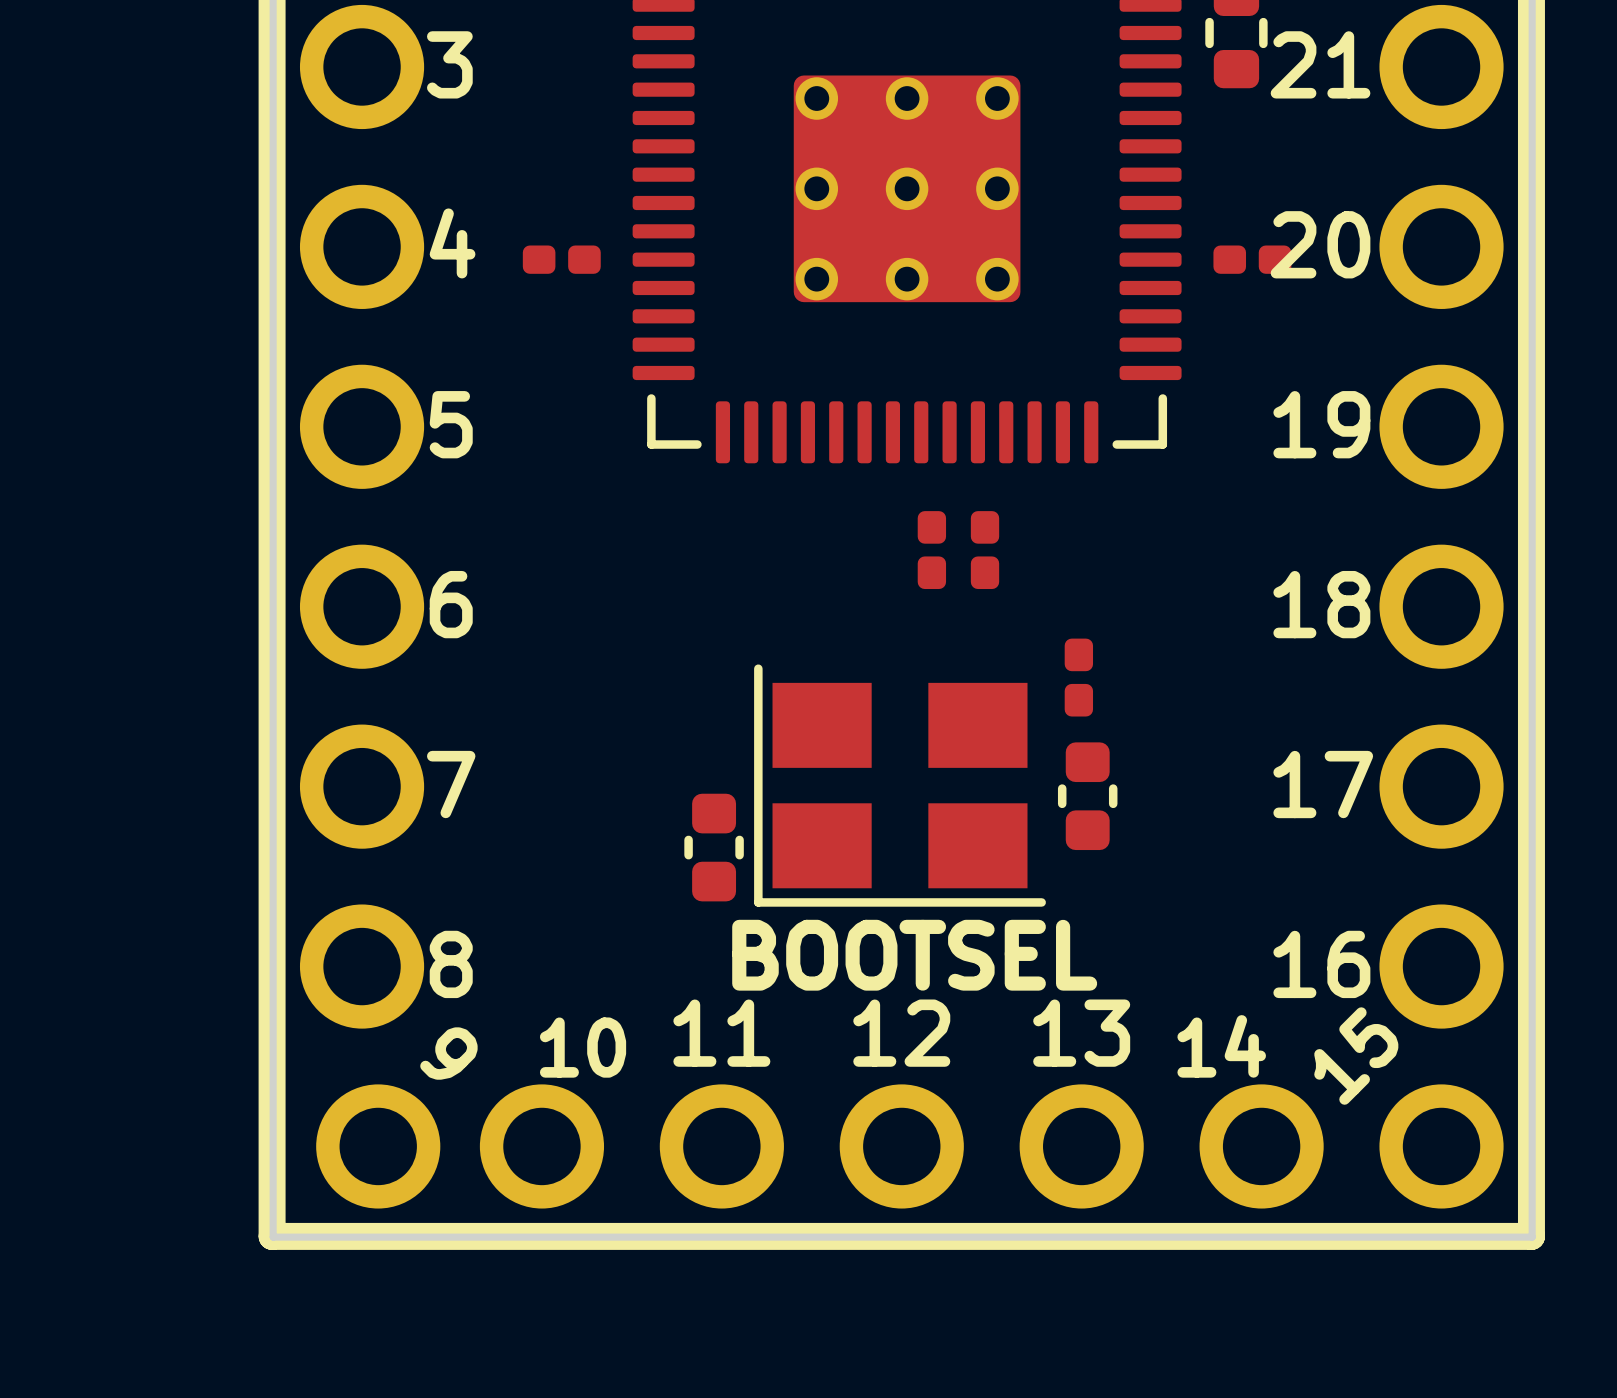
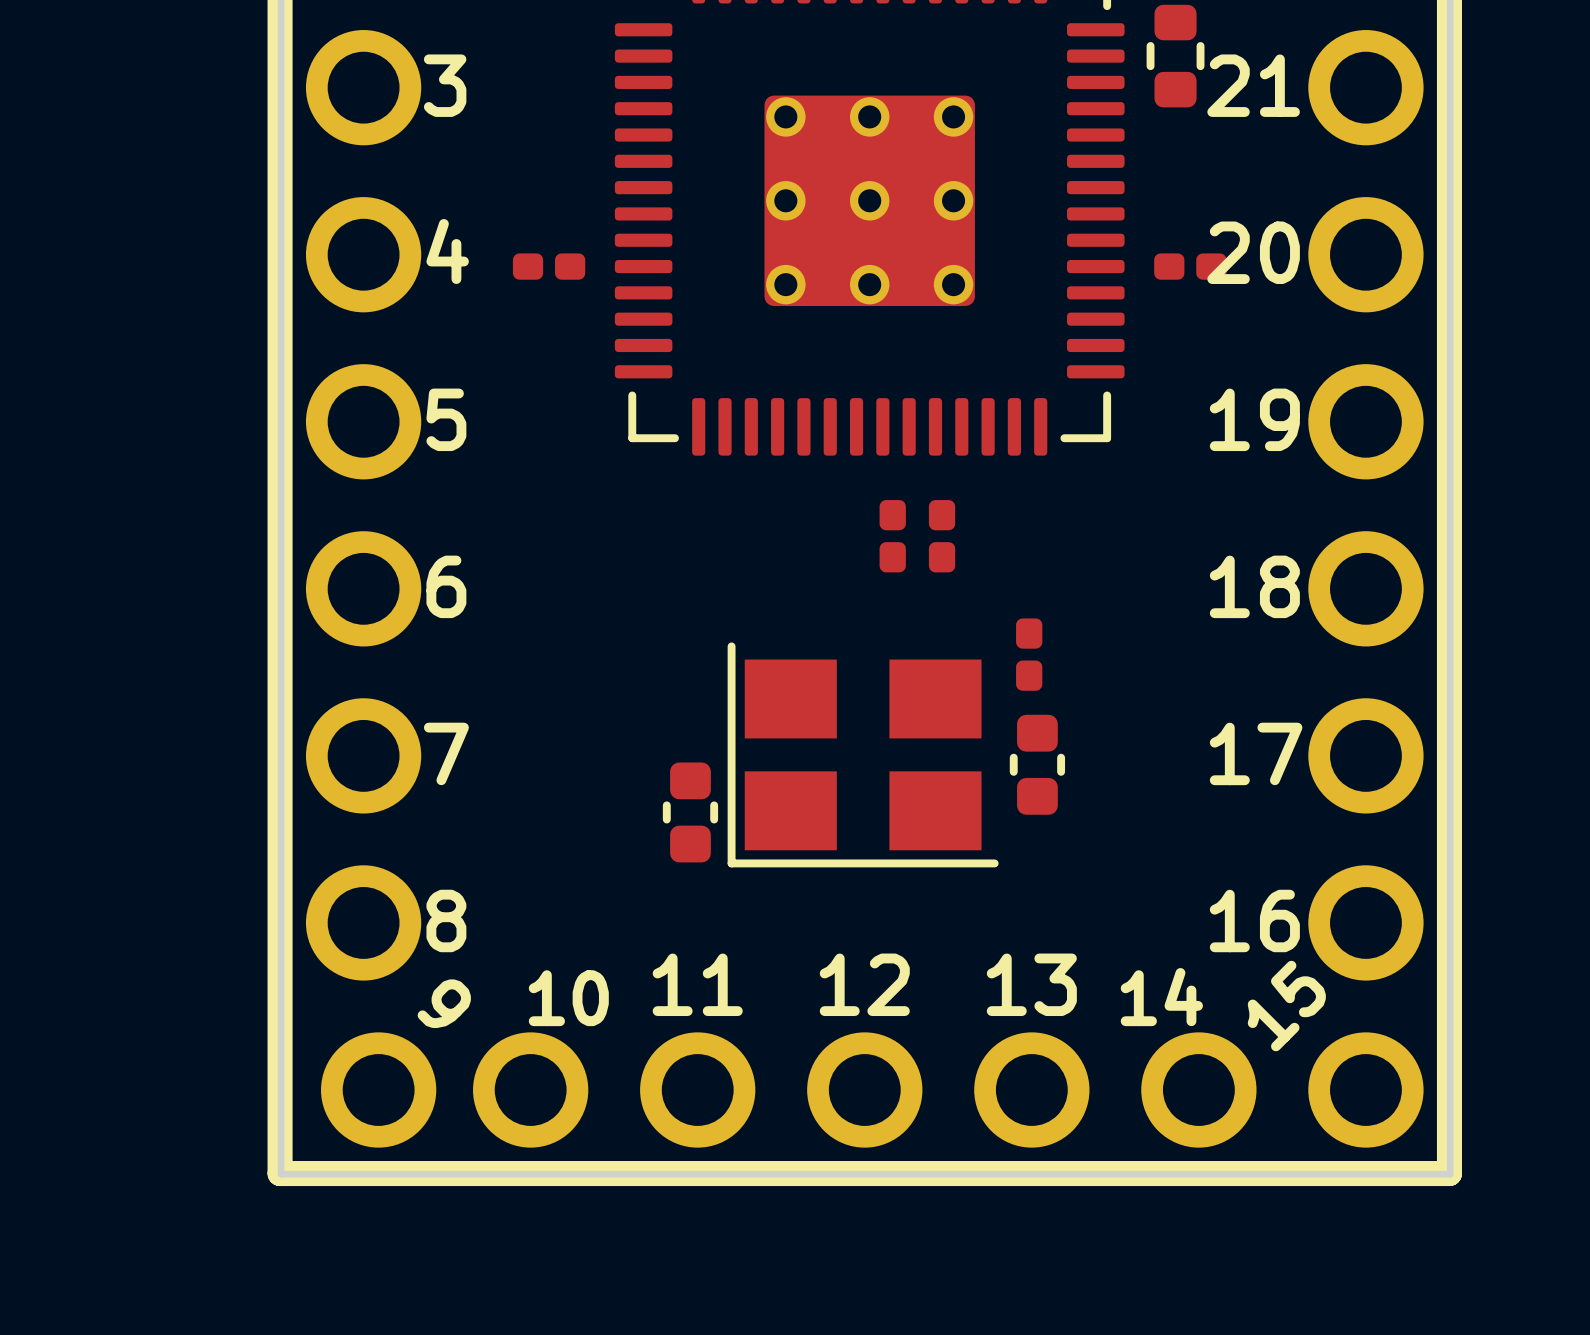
text: BOOTSEL (914, 955) -> none

